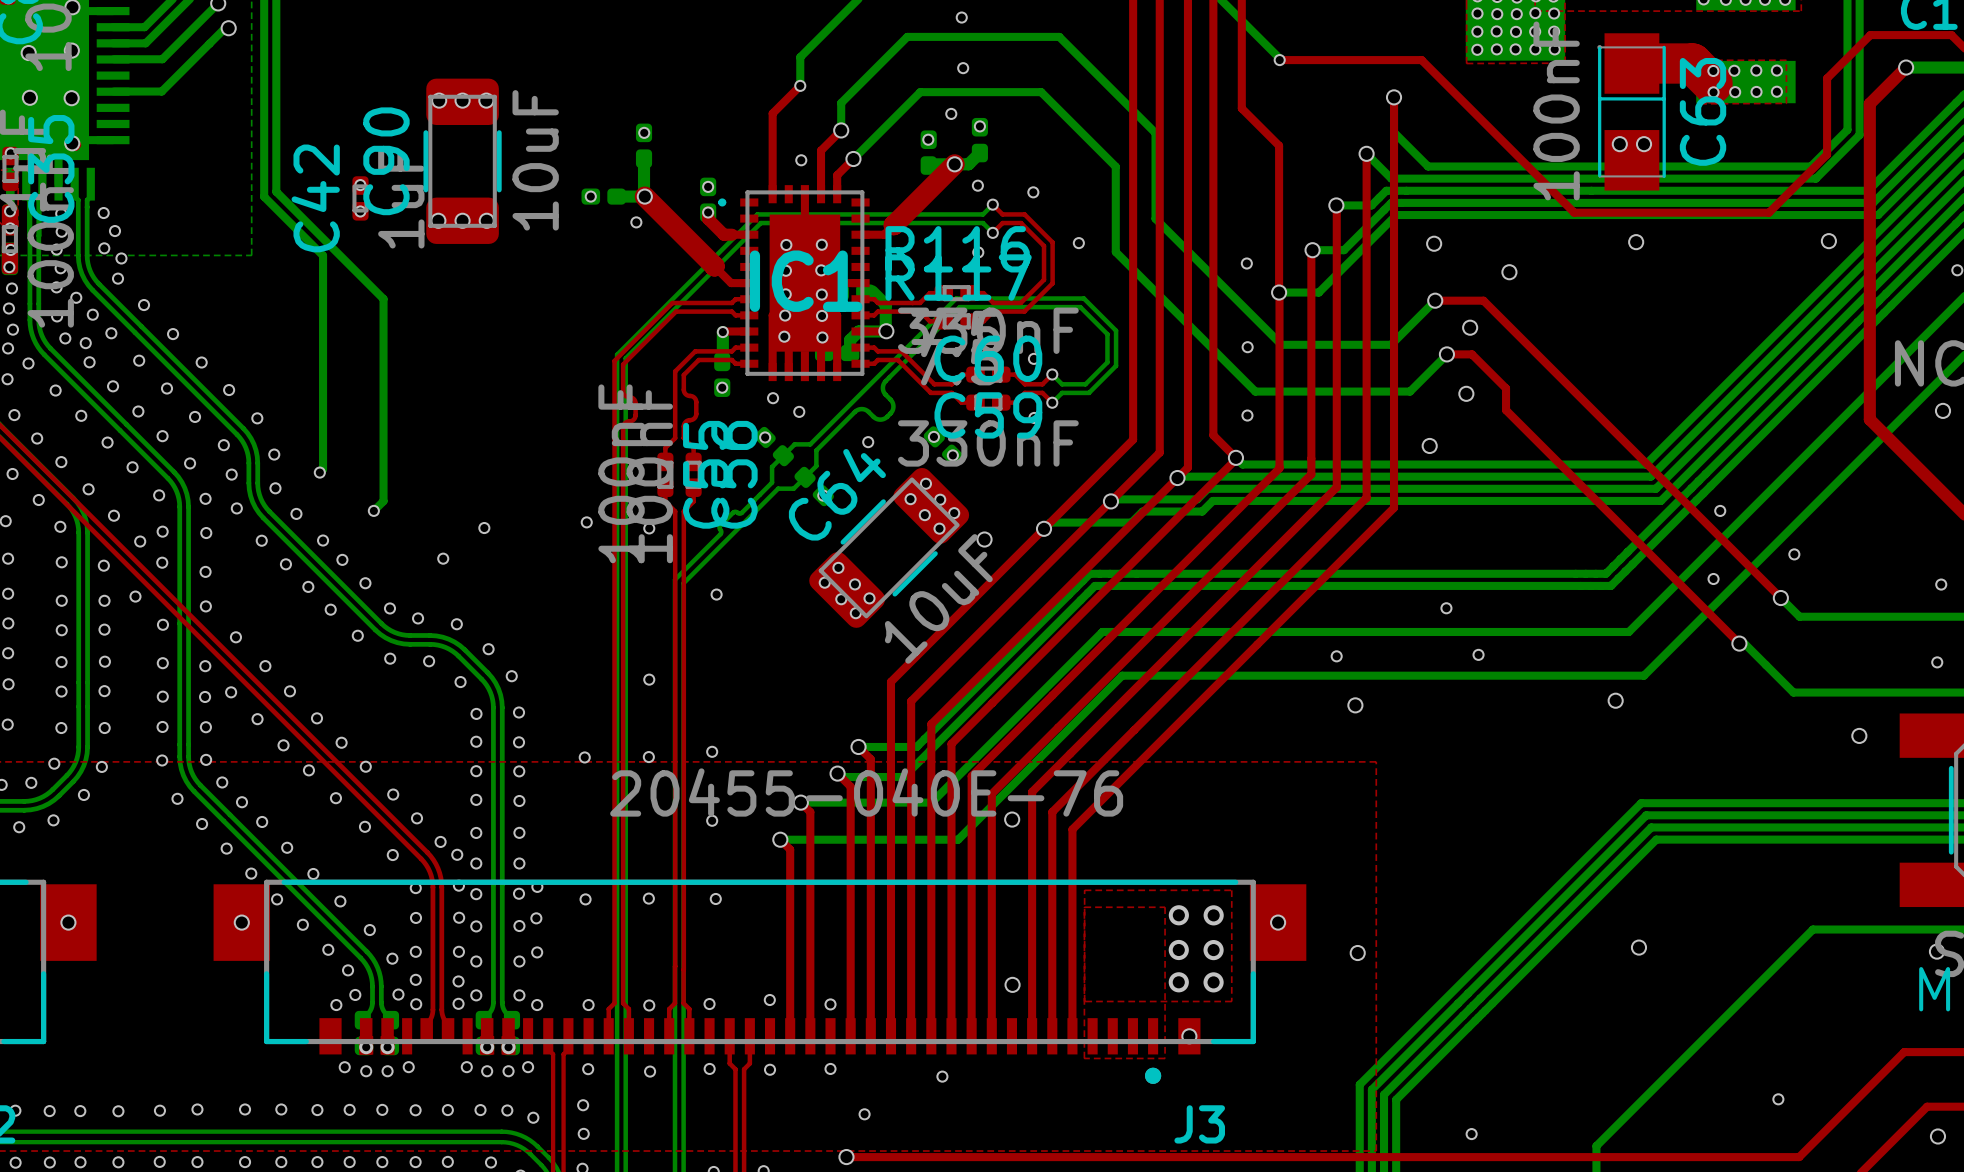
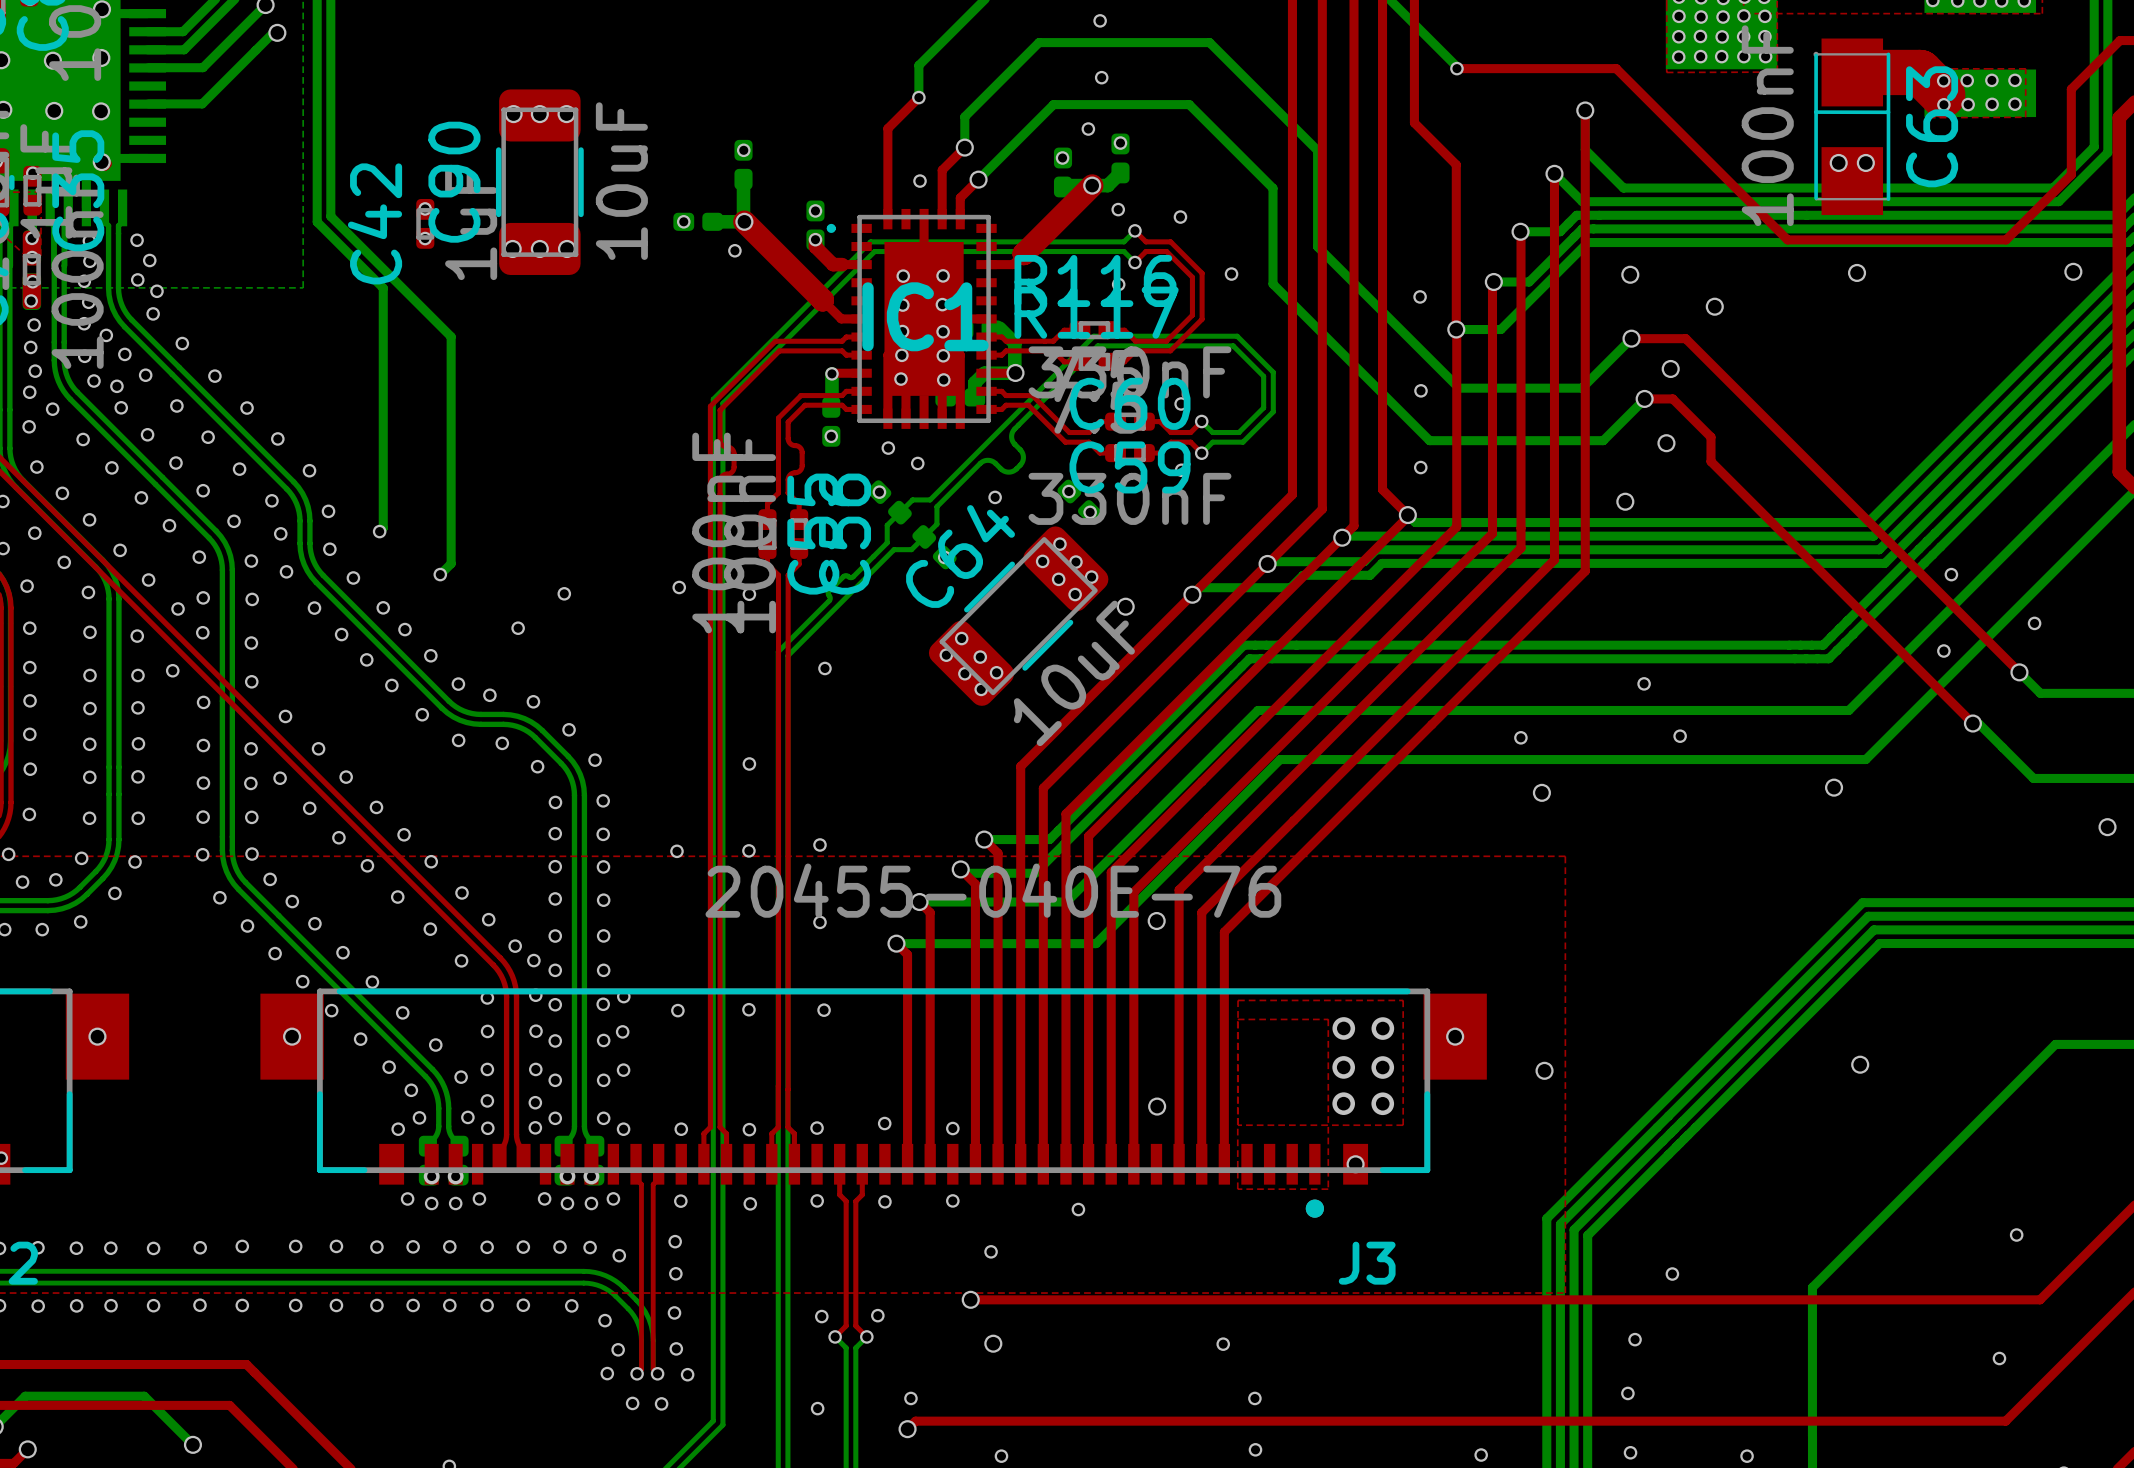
J3 footprint: [213, 879, 1307, 1084] -> [260, 988, 1487, 1218]

